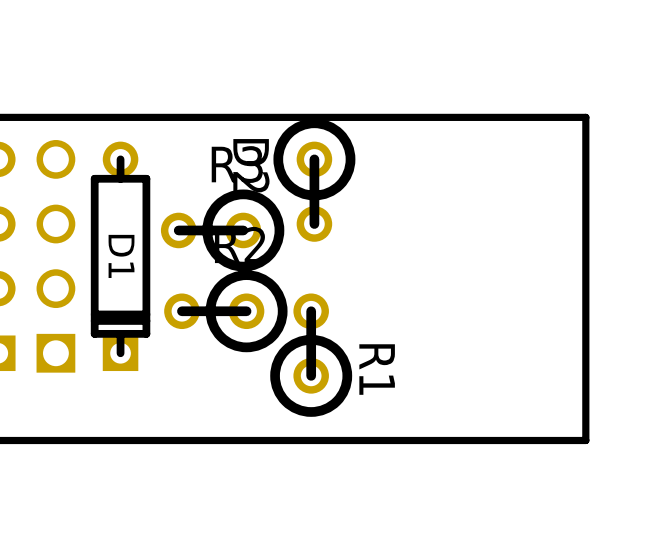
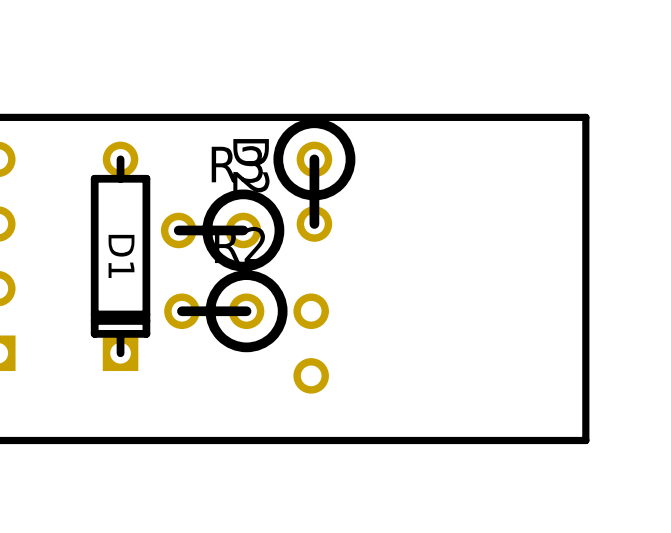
part: (55, 256) -> none
R1 side: bottom (311, 355) -> top (311, 343)

